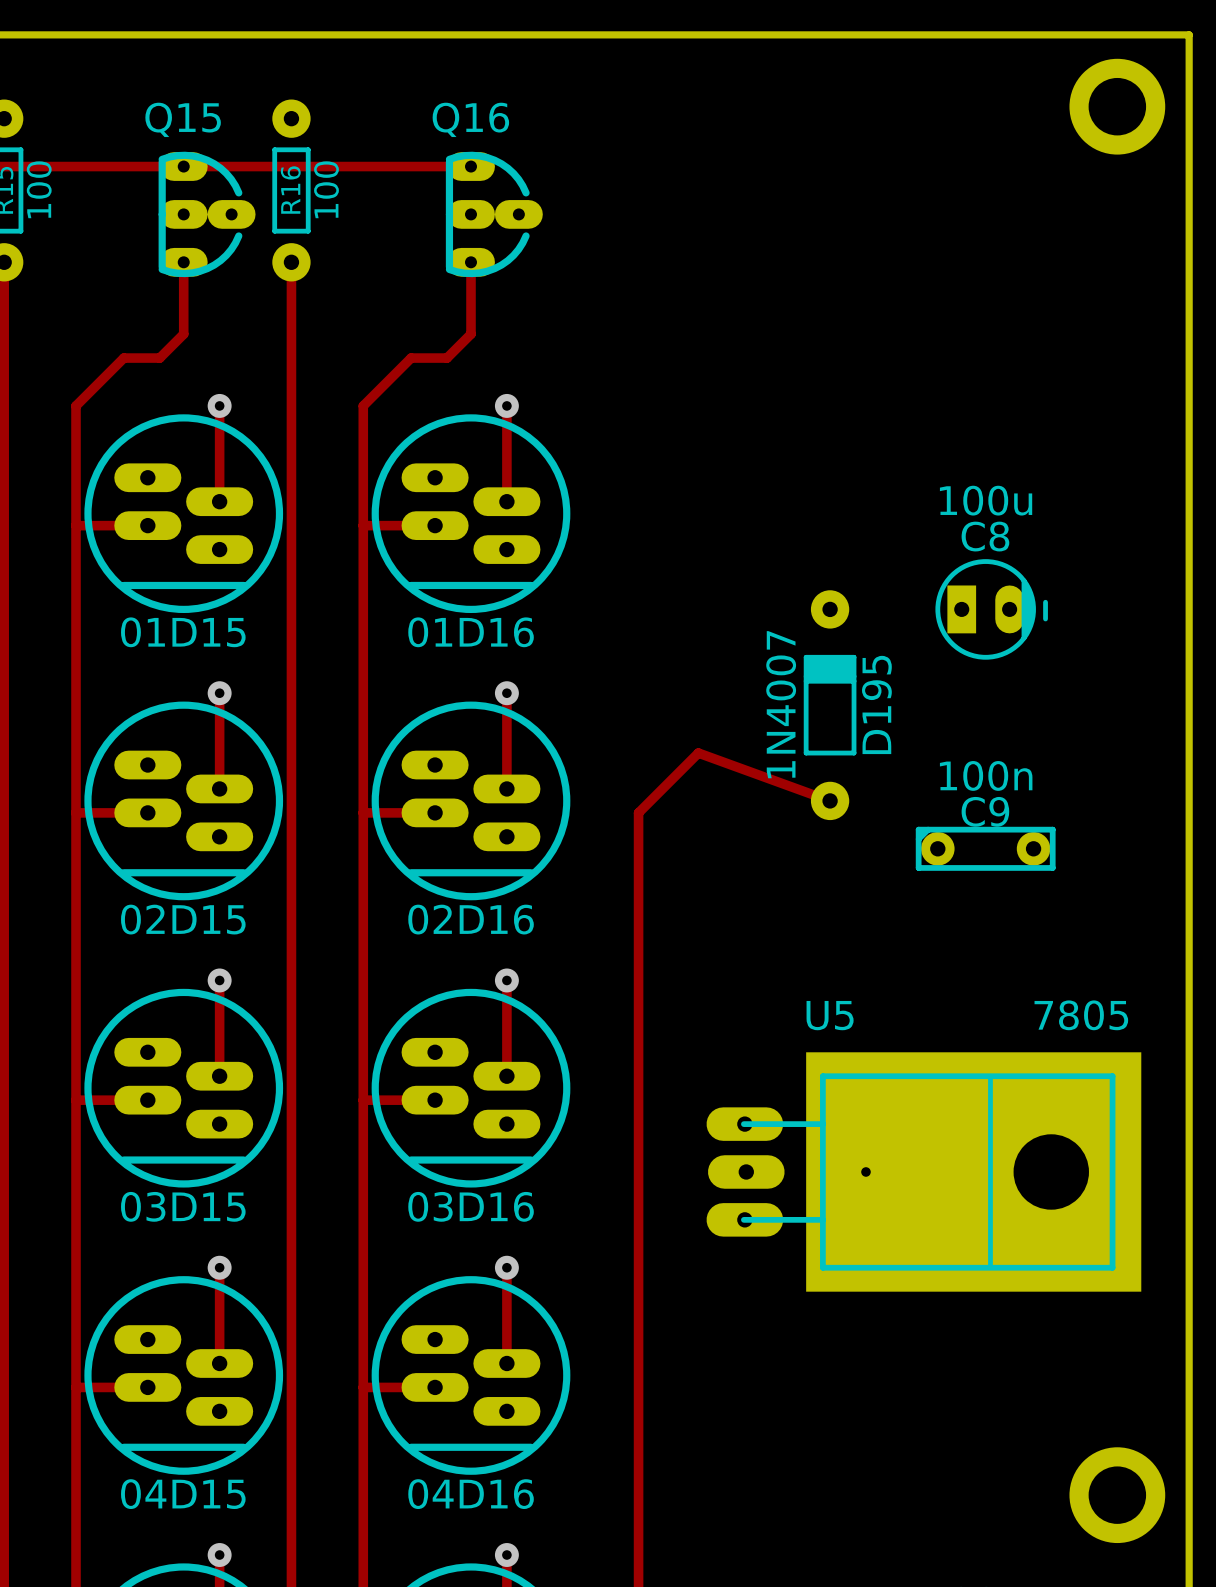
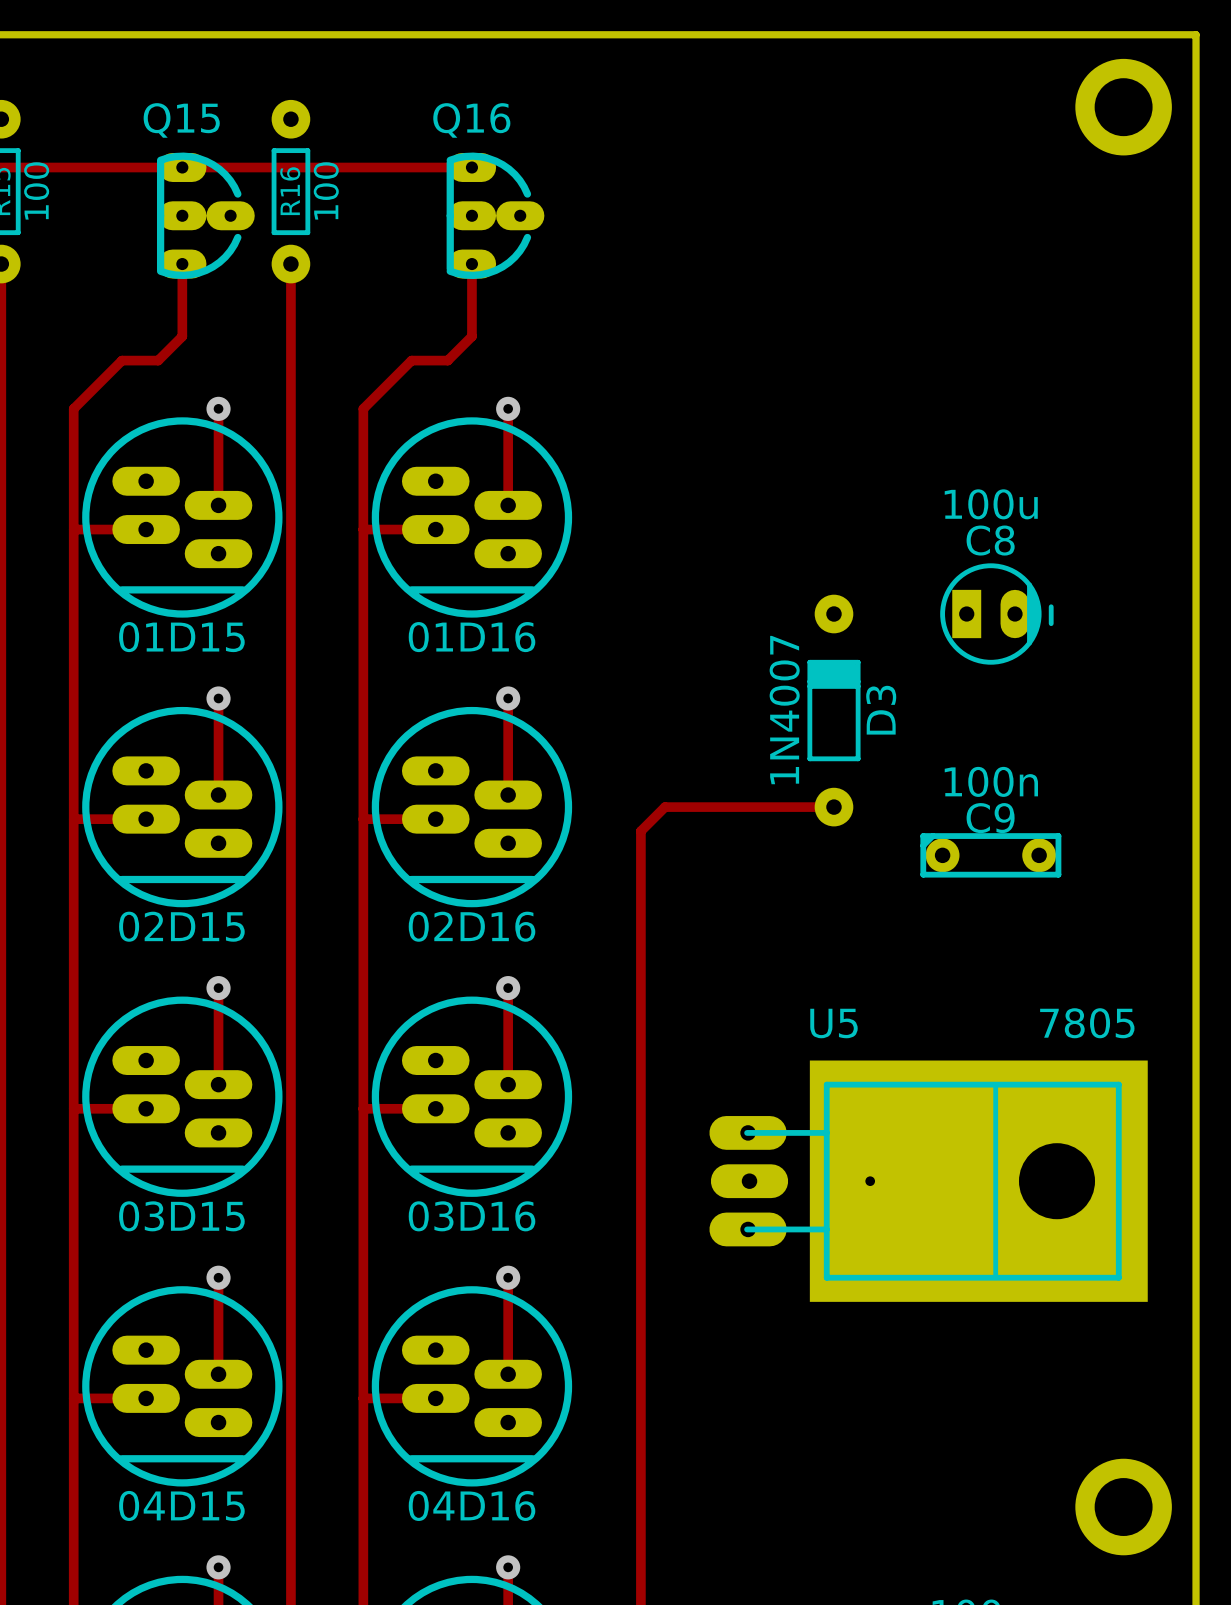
D195 name: D195 (876, 704) -> D3 (881, 710)
track: (830, 800) (698, 753) (638, 812) (638, 824) -> (833, 807) (665, 807) (640, 831)

